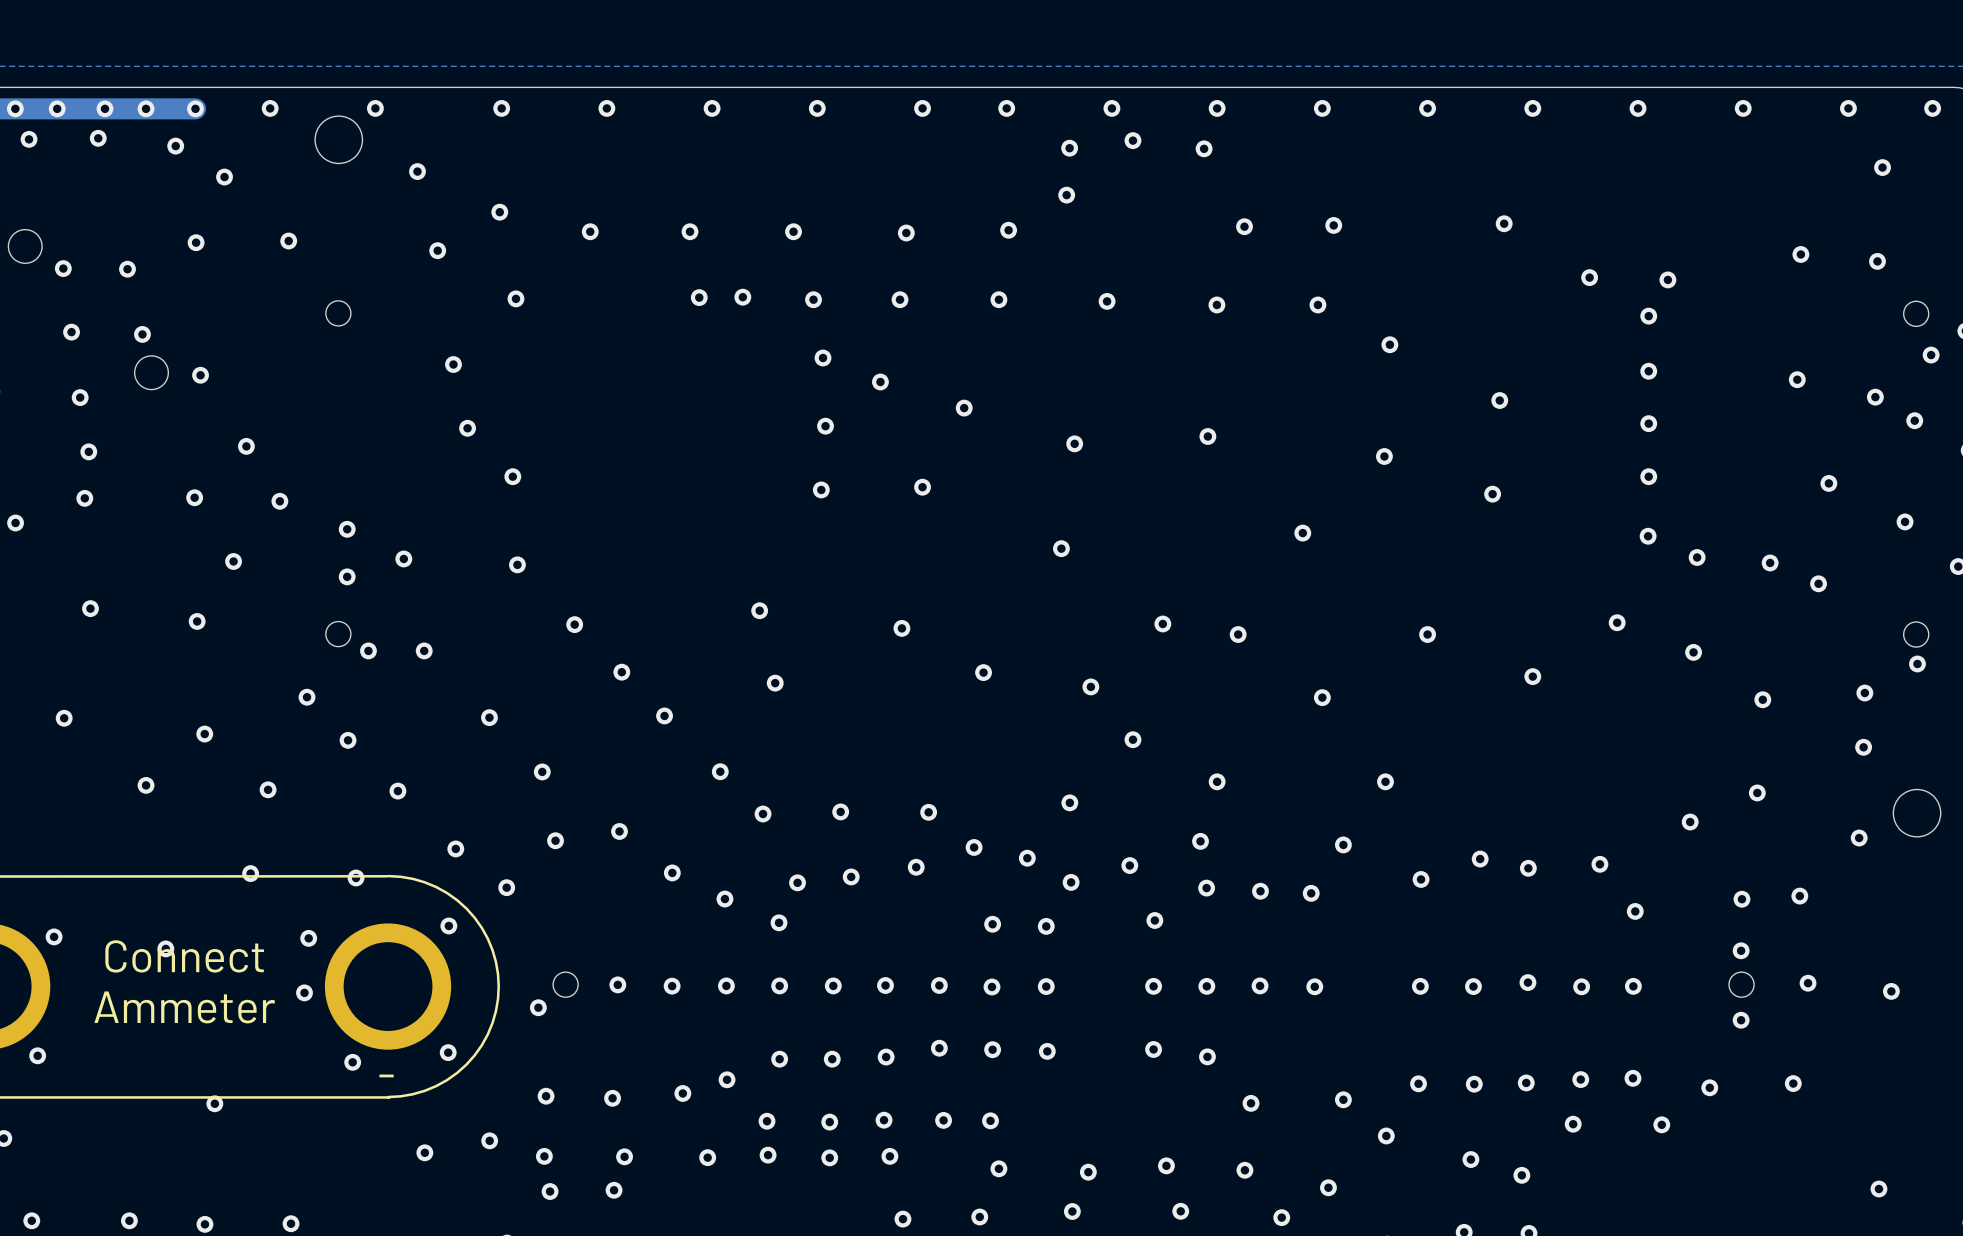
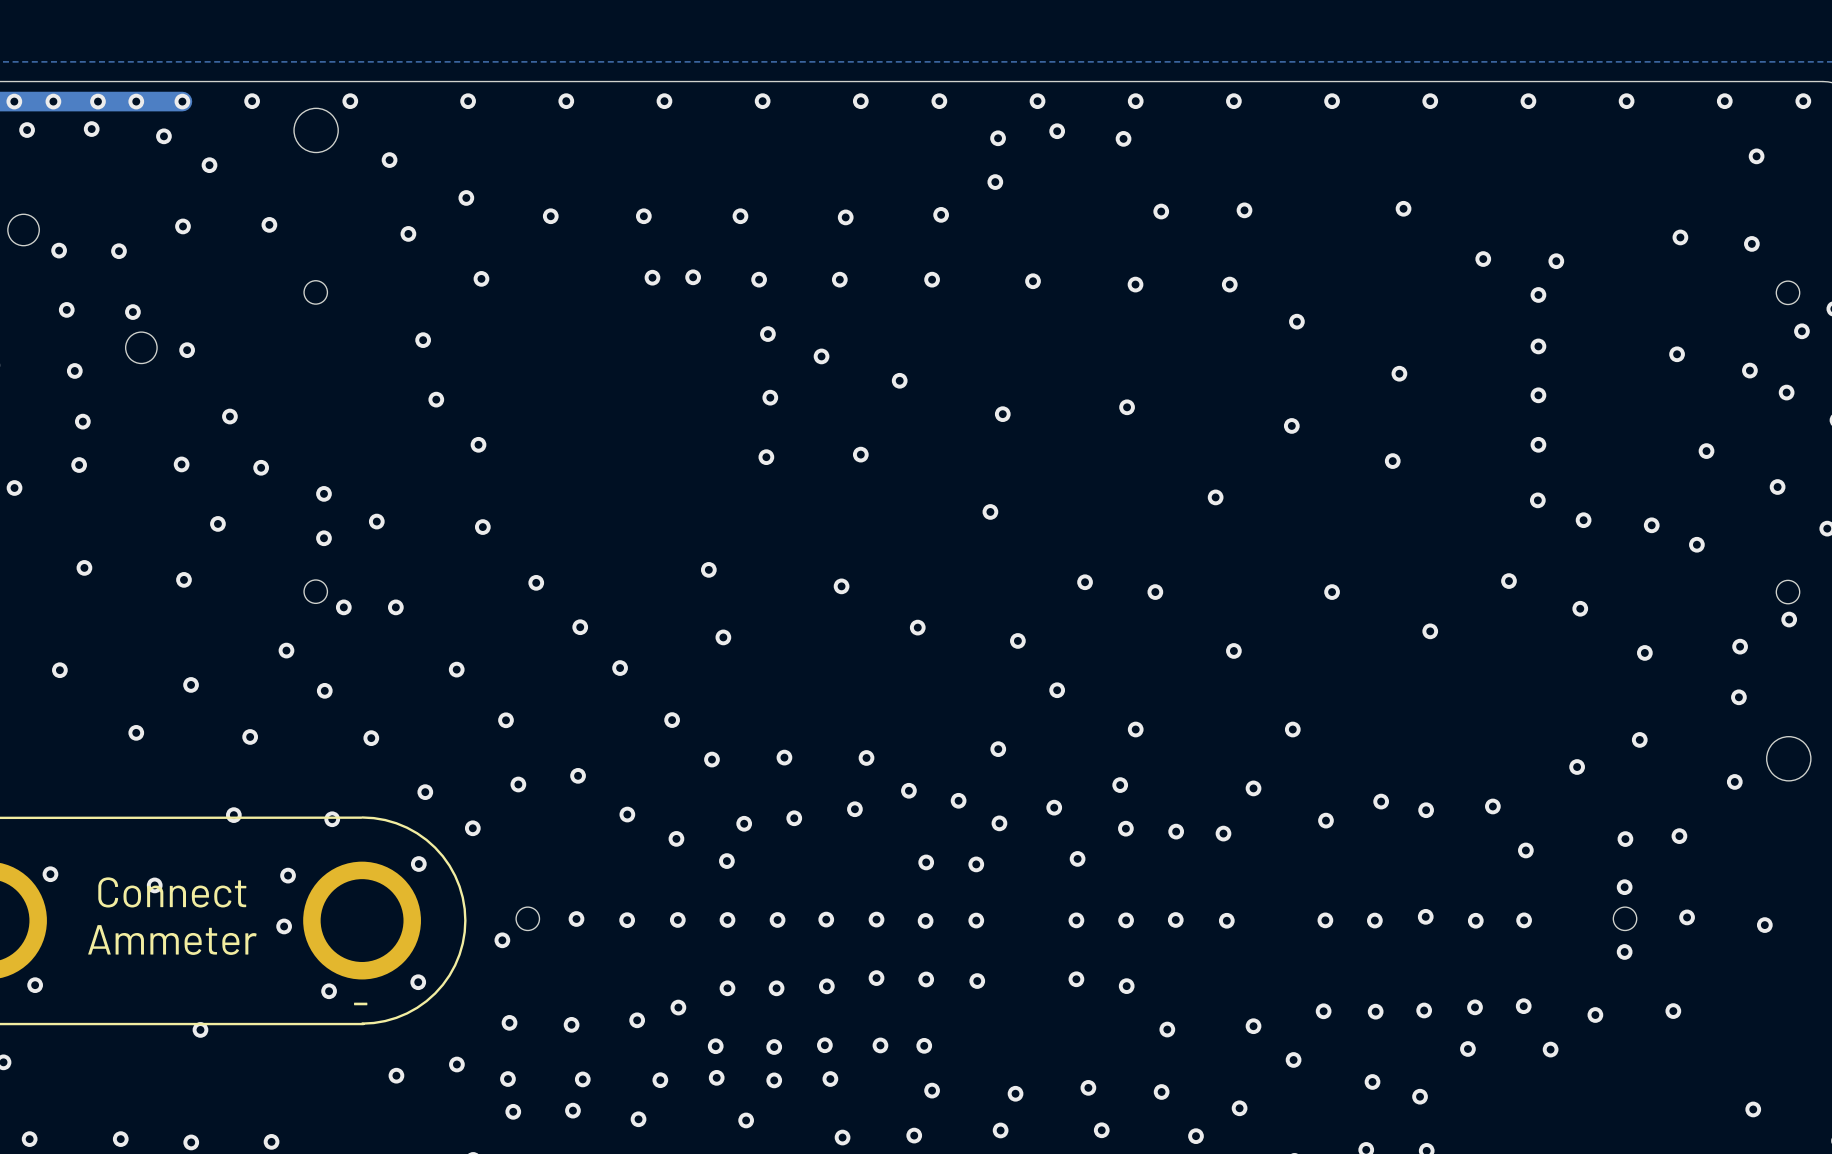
via: none -> (638, 1119)
via: none -> (746, 1120)

